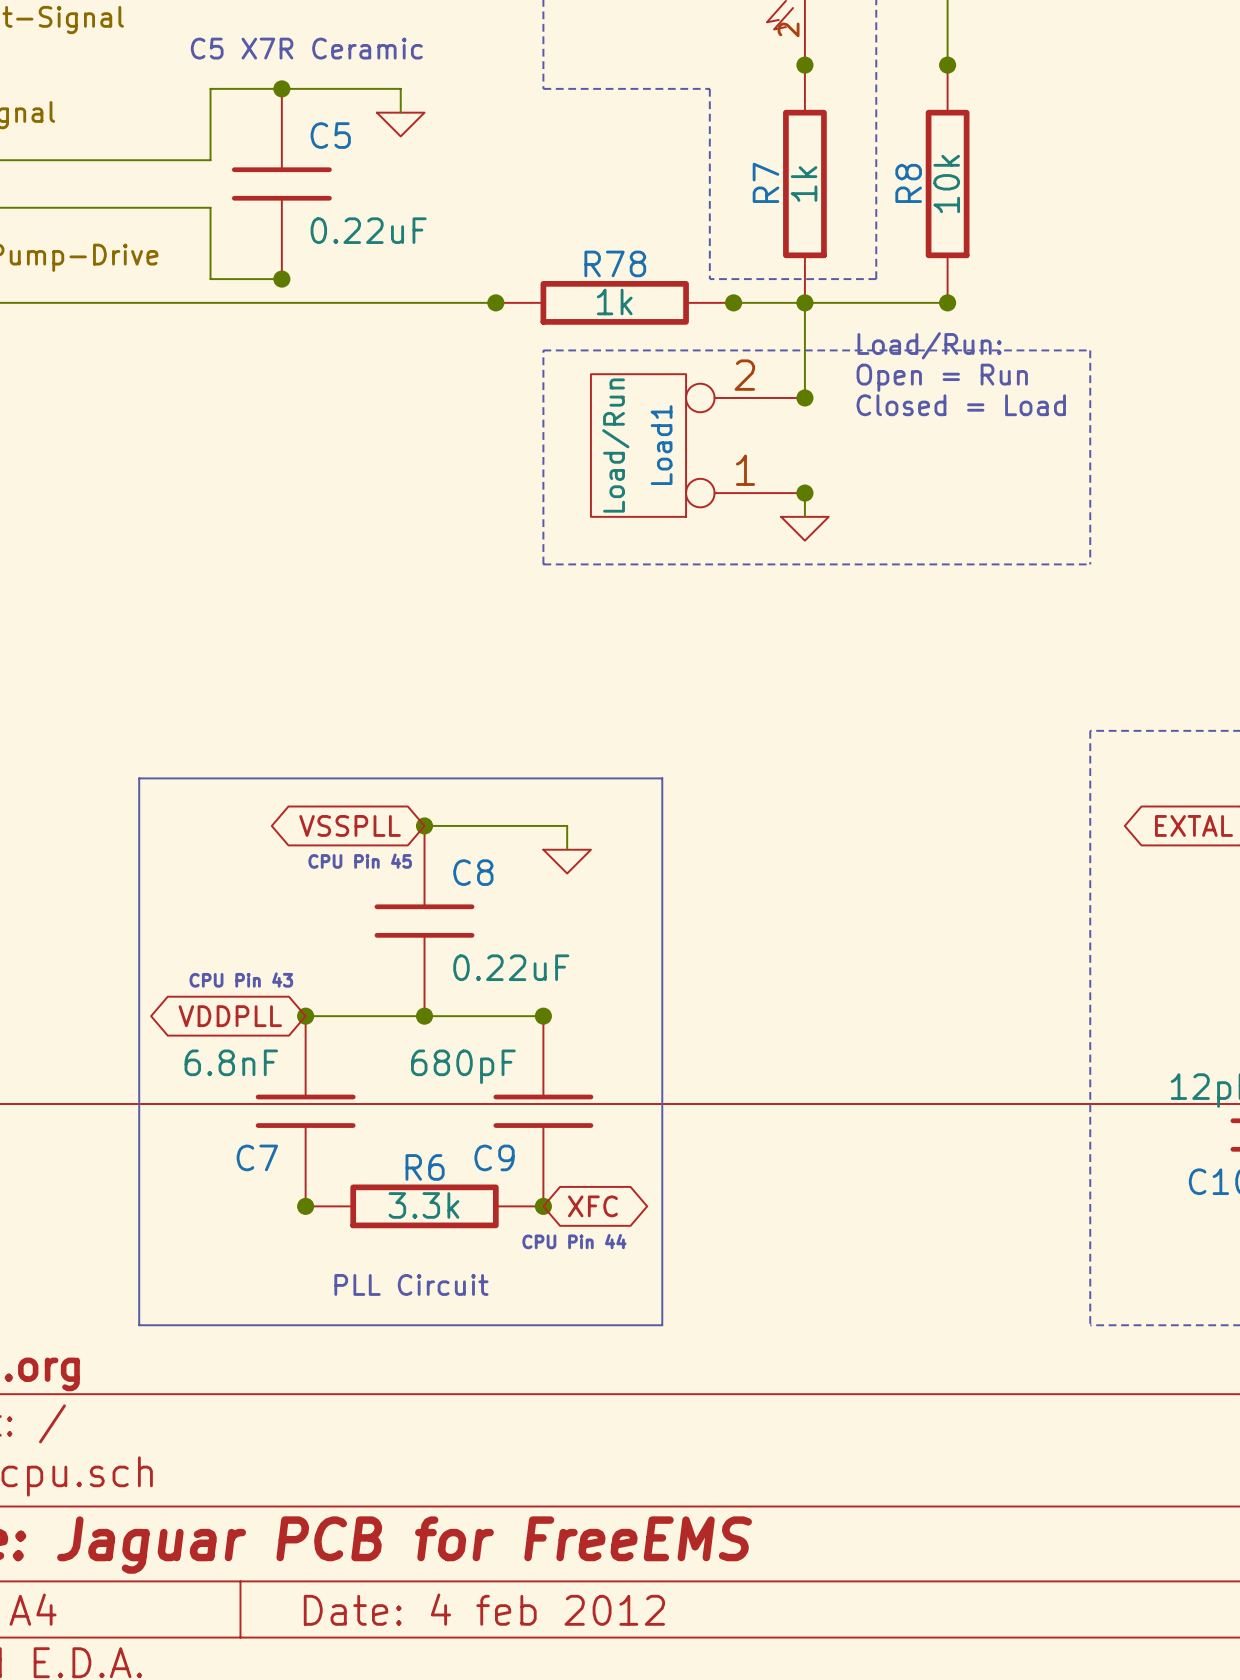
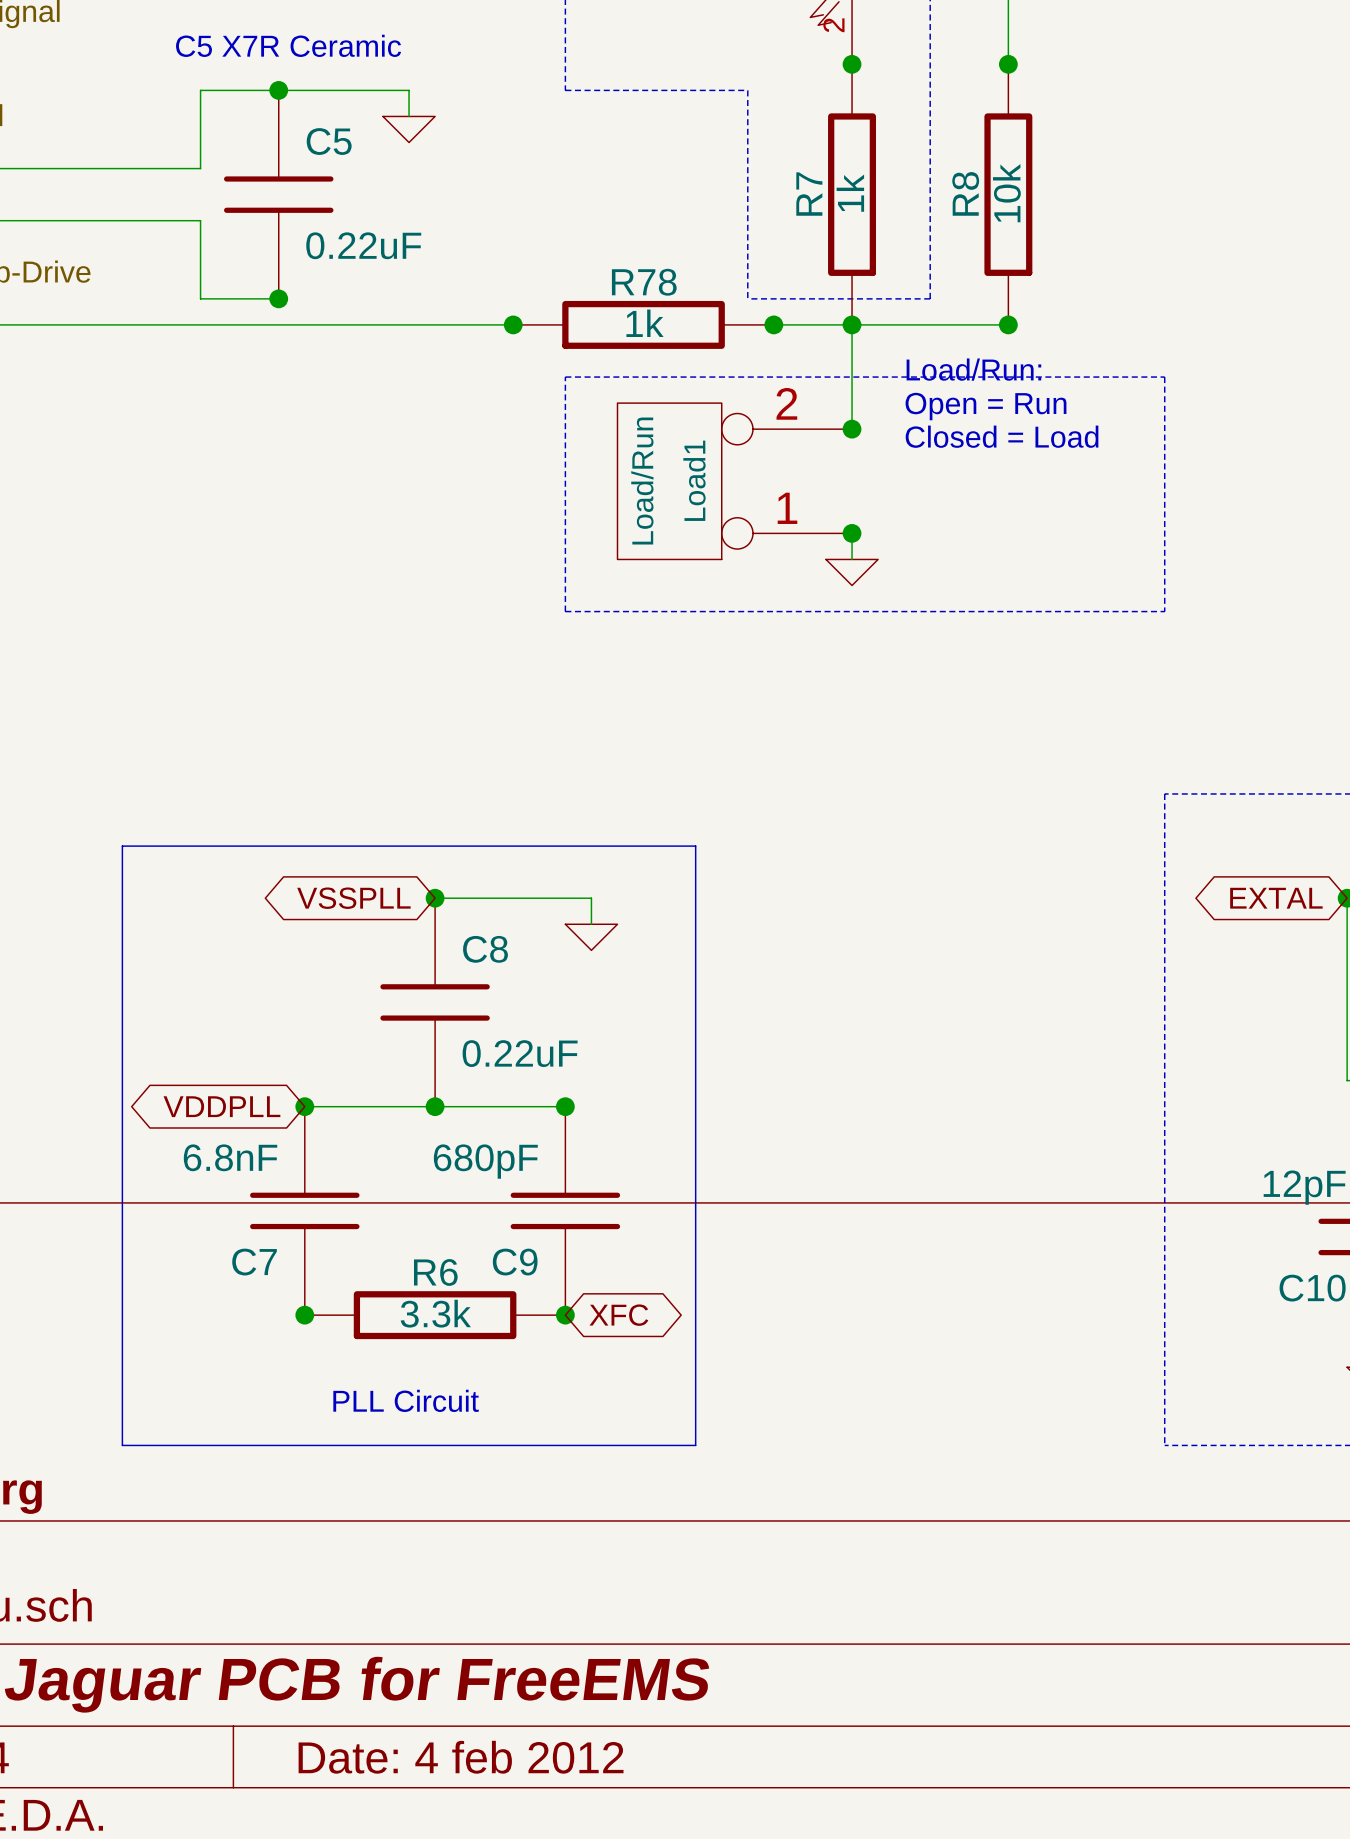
text: CPU Pin 45 (360, 861) -> none
text: CPU Pin 43 (241, 980) -> none
text: CPU Pin 44 (574, 1241) -> none

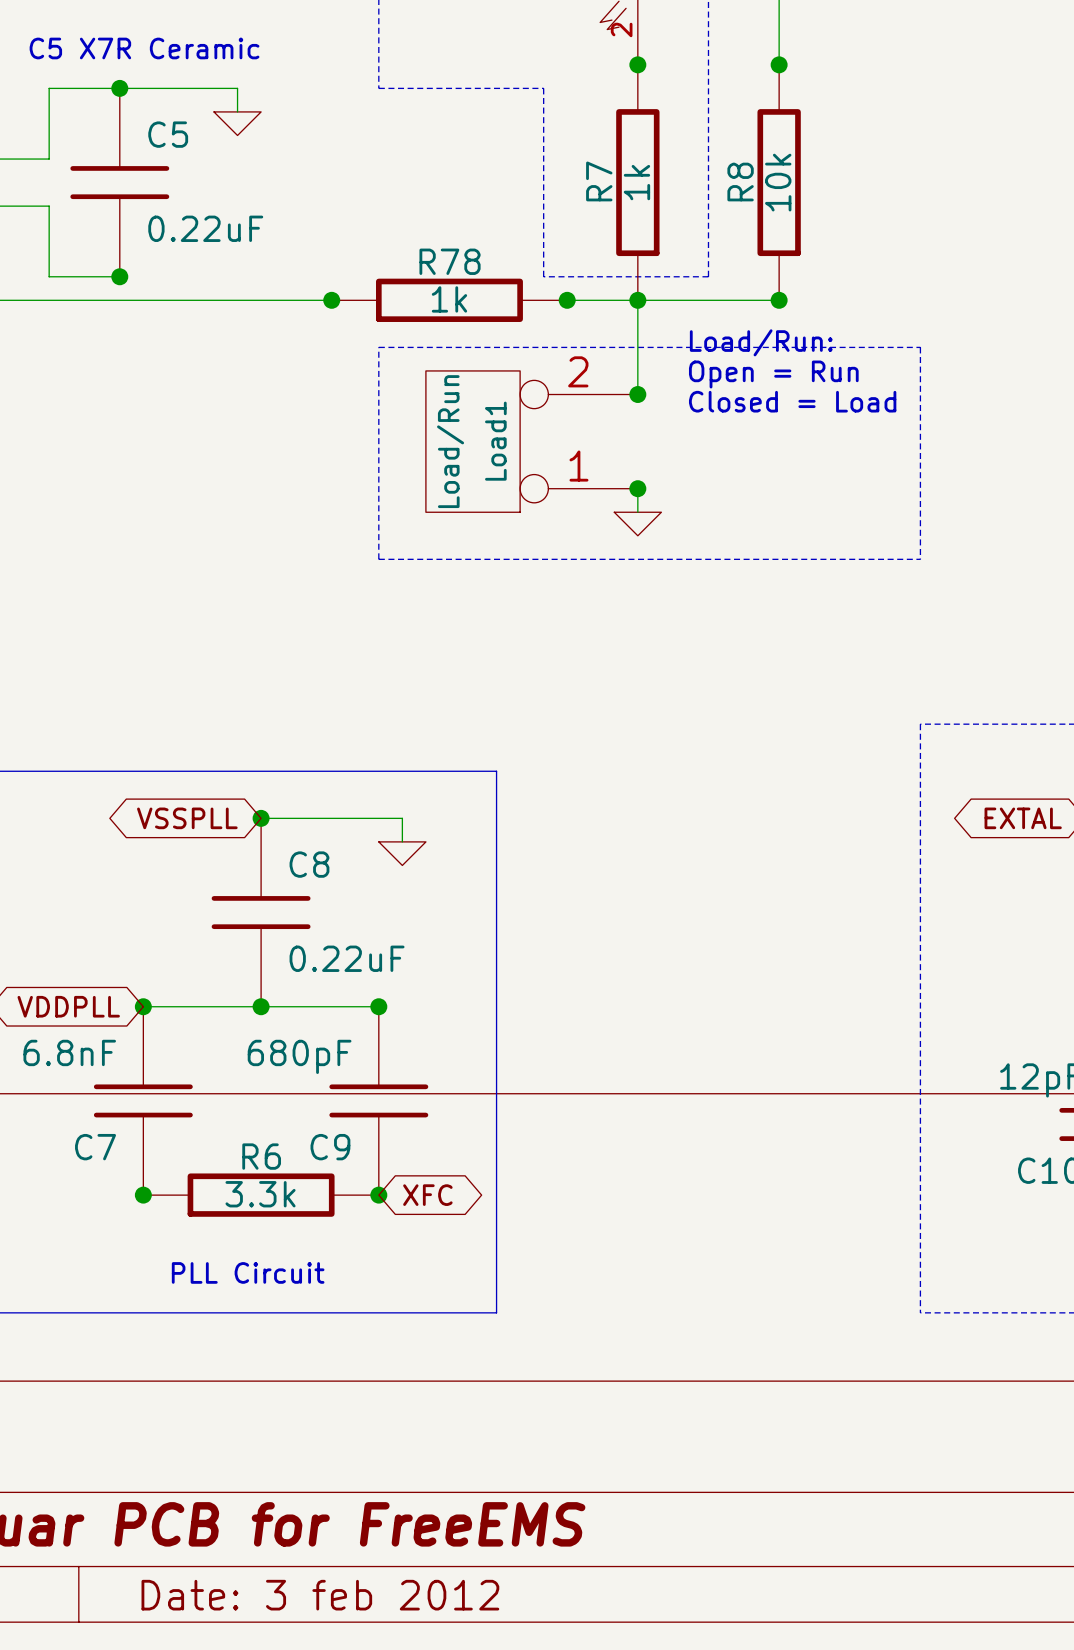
title block: Date: 4 feb 2012 (461, 1757) -> Date: 3 feb 2012 (320, 1595)

